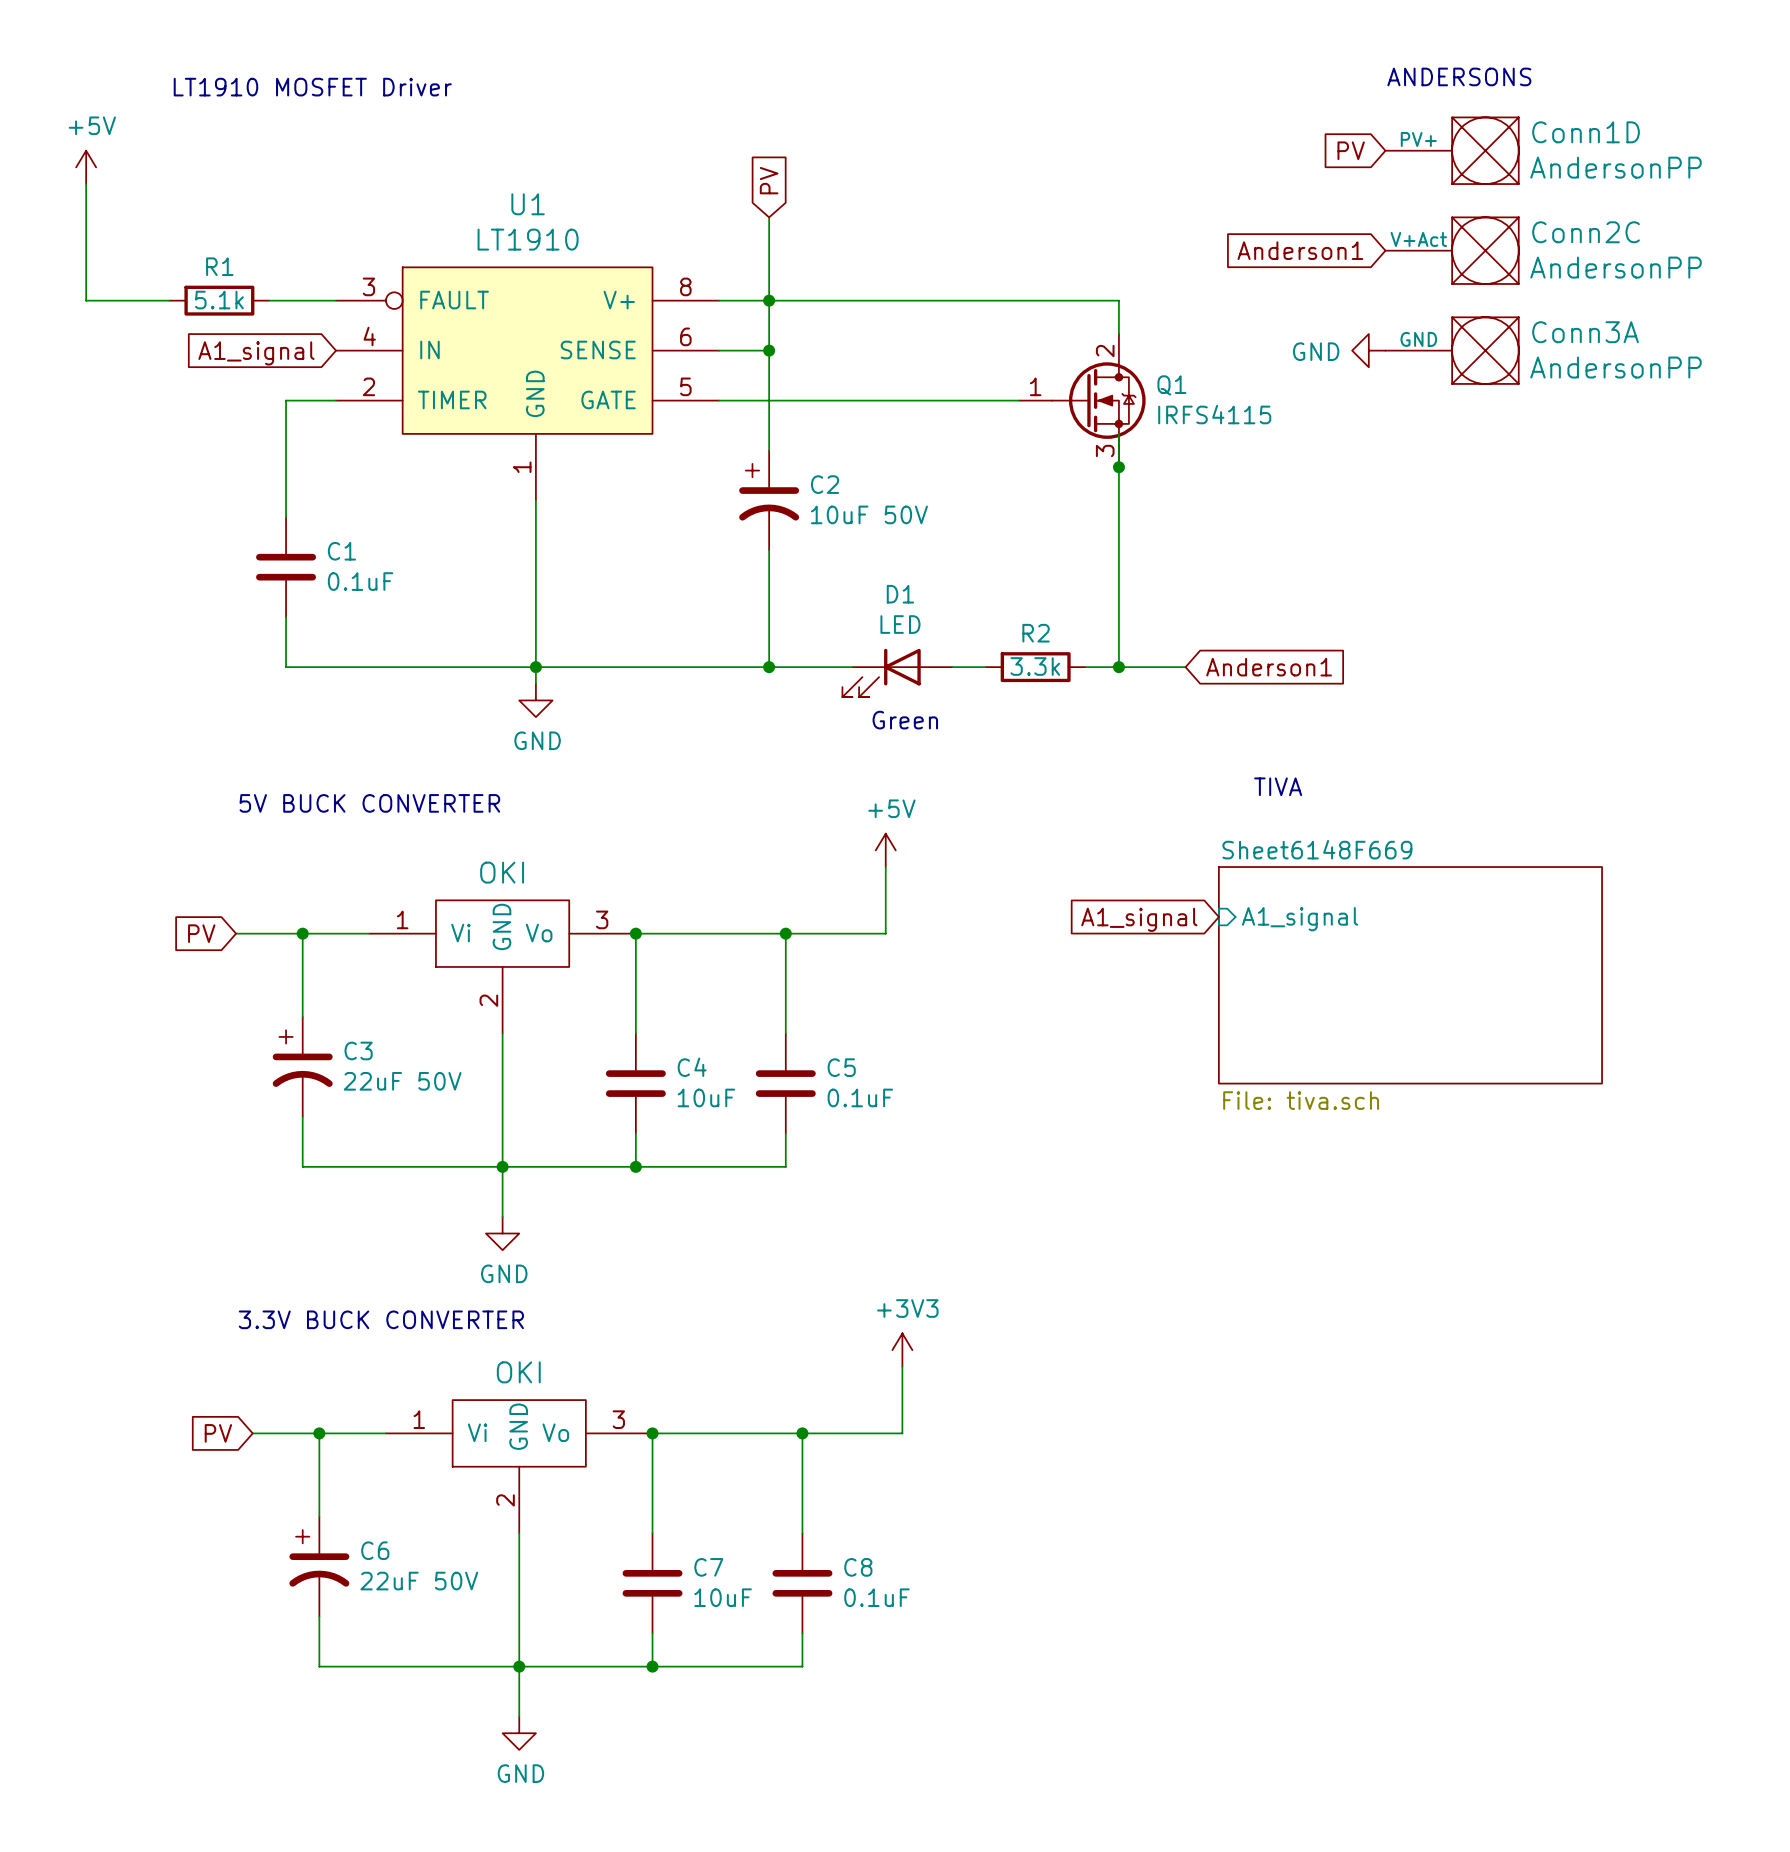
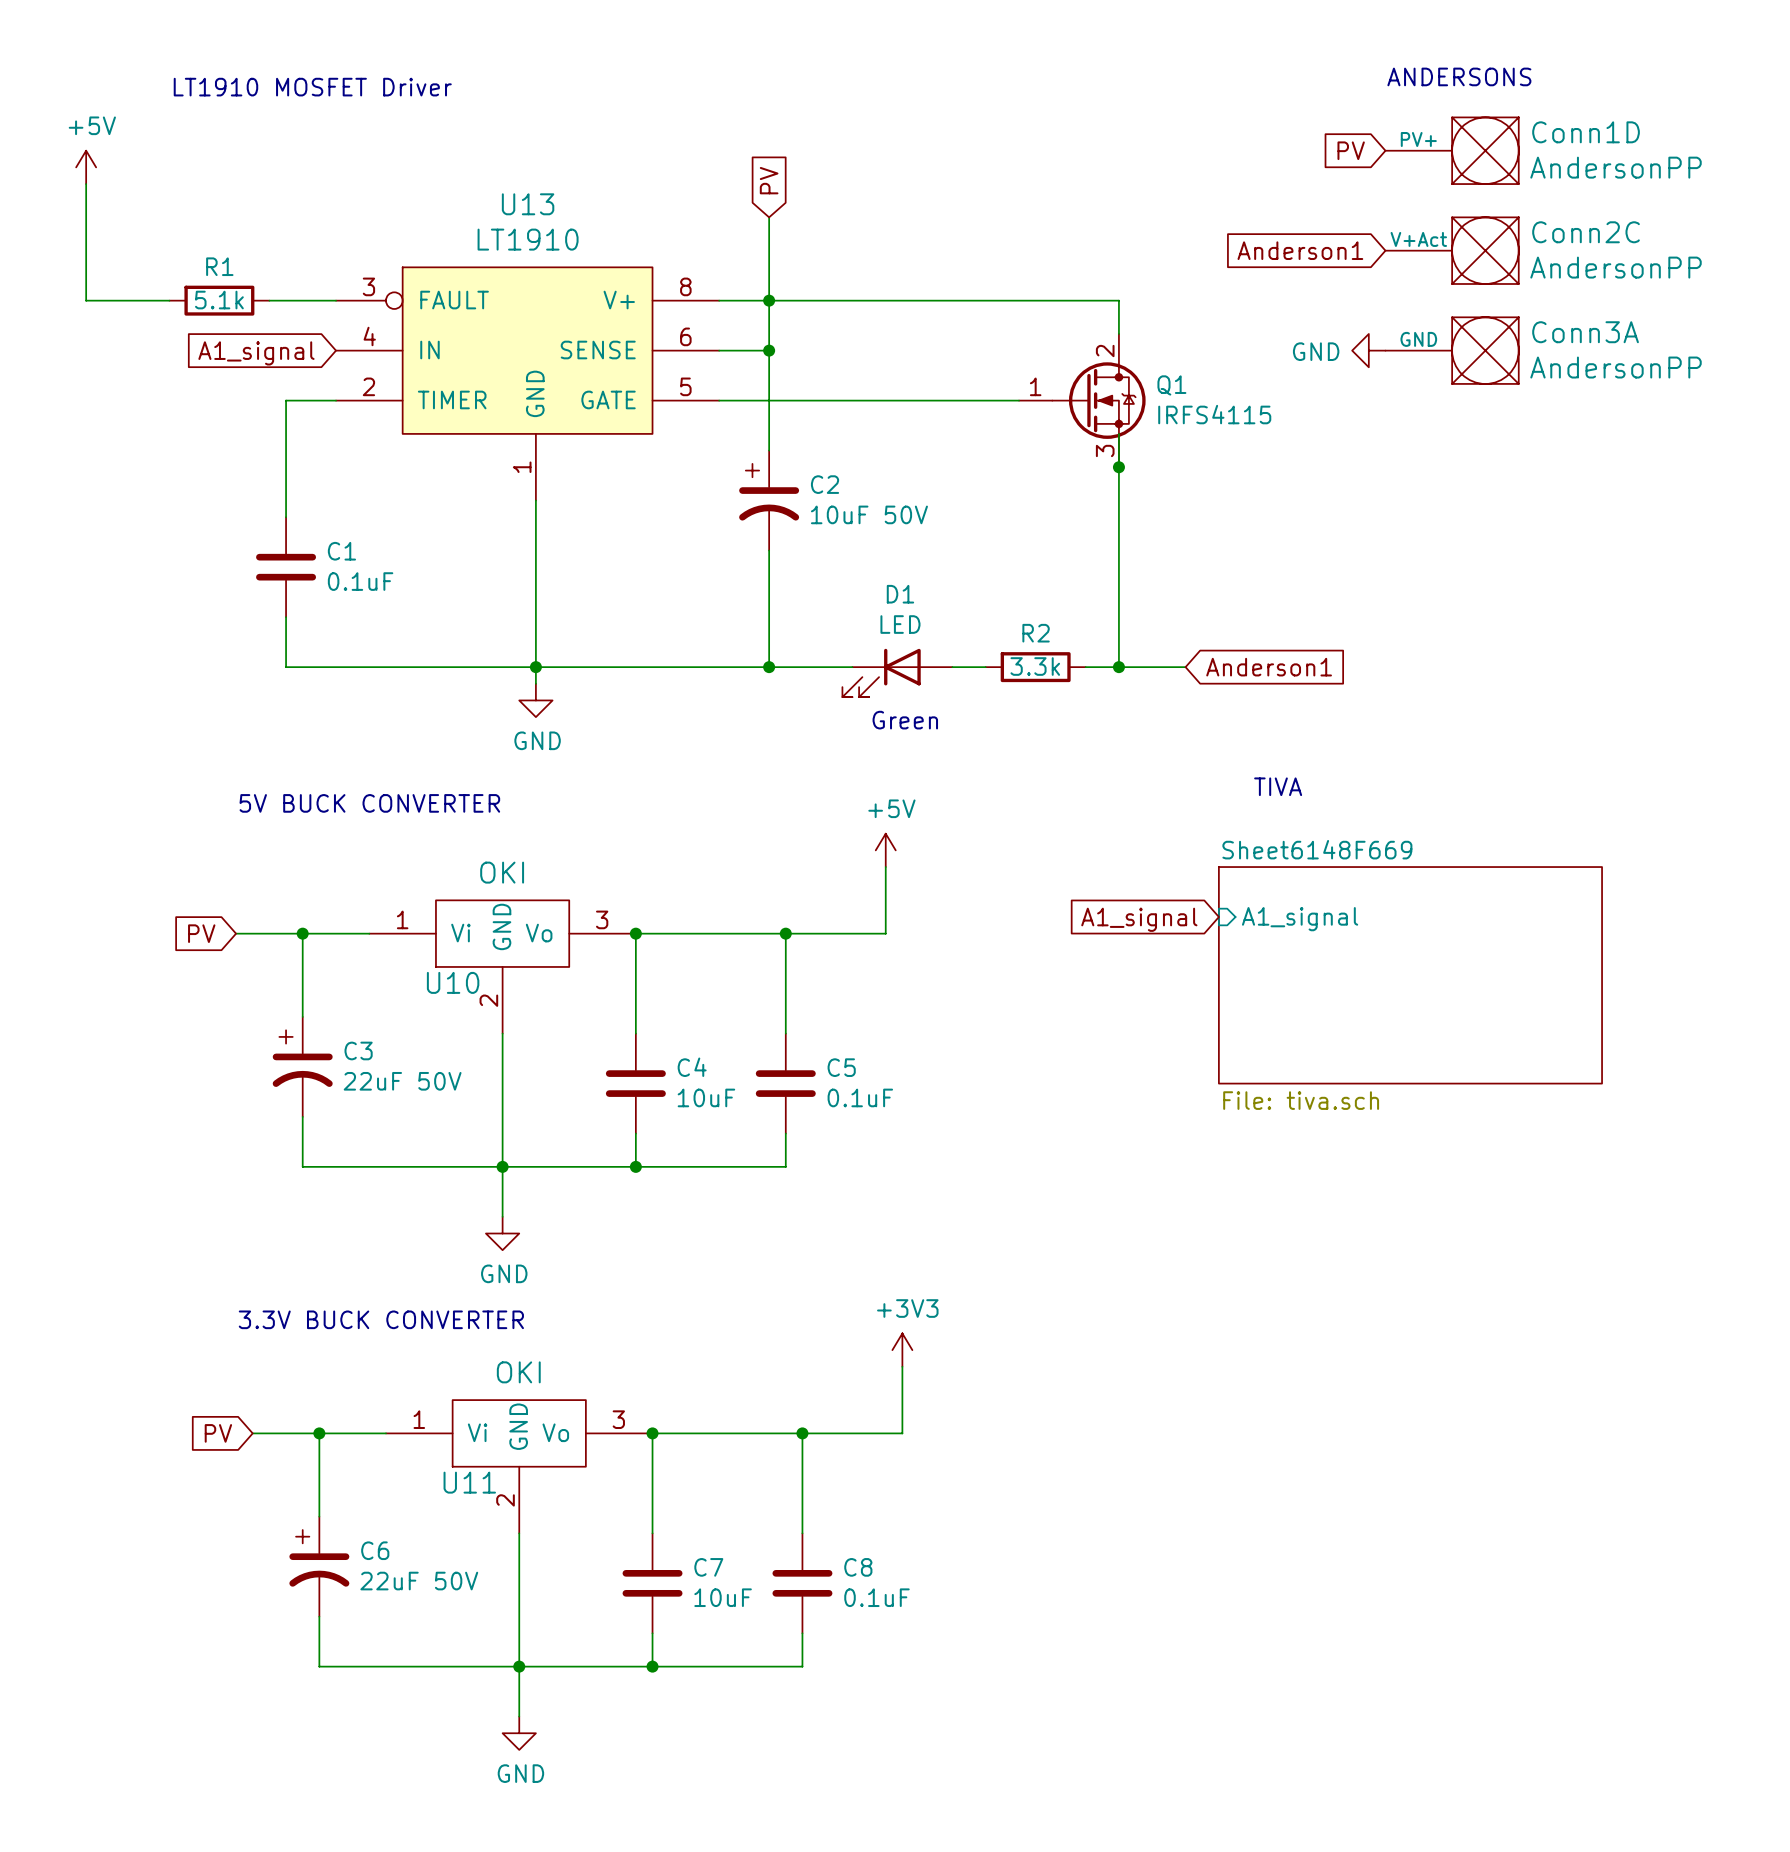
U1 name: U1 (528, 204) -> U13 (528, 204)
U10 name: none -> U10 (453, 982)
U11 name: none -> U11 (469, 1482)

